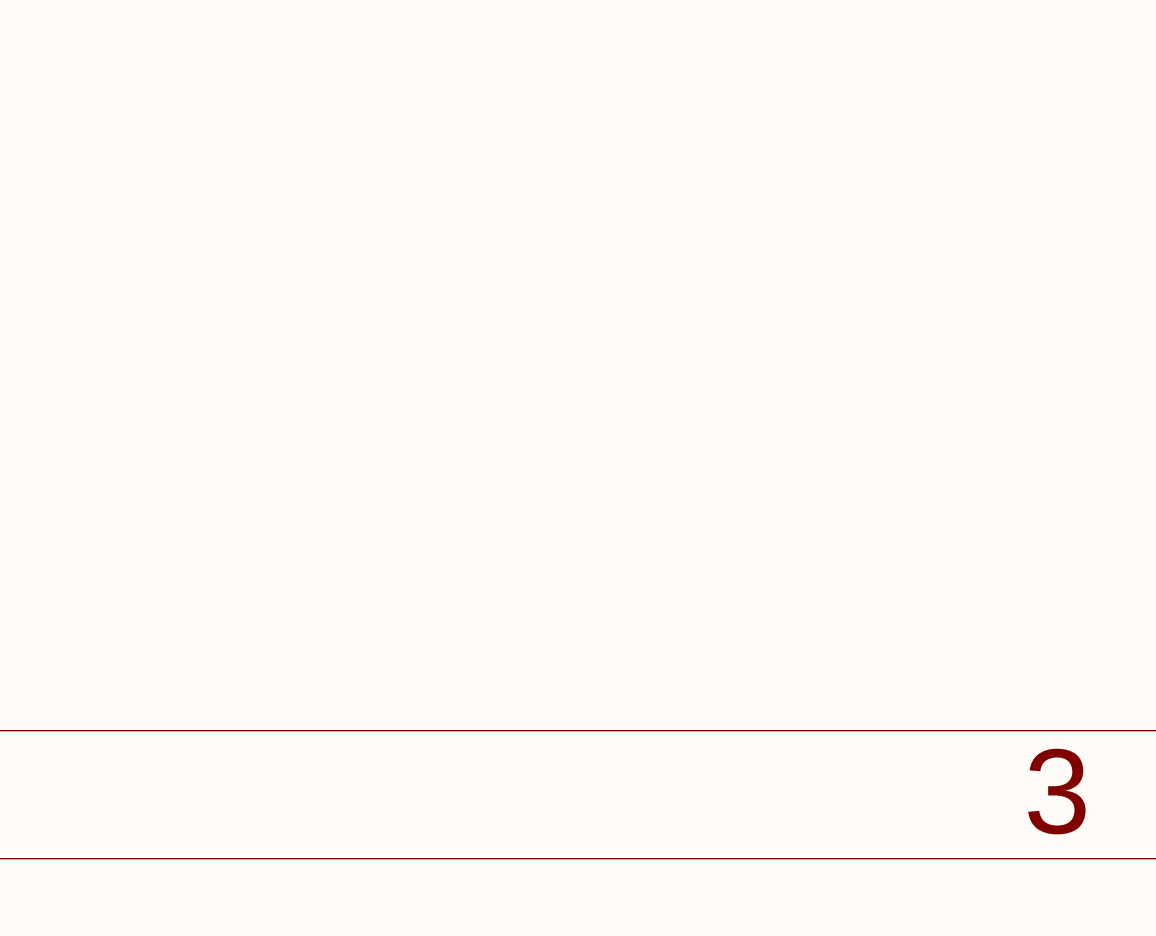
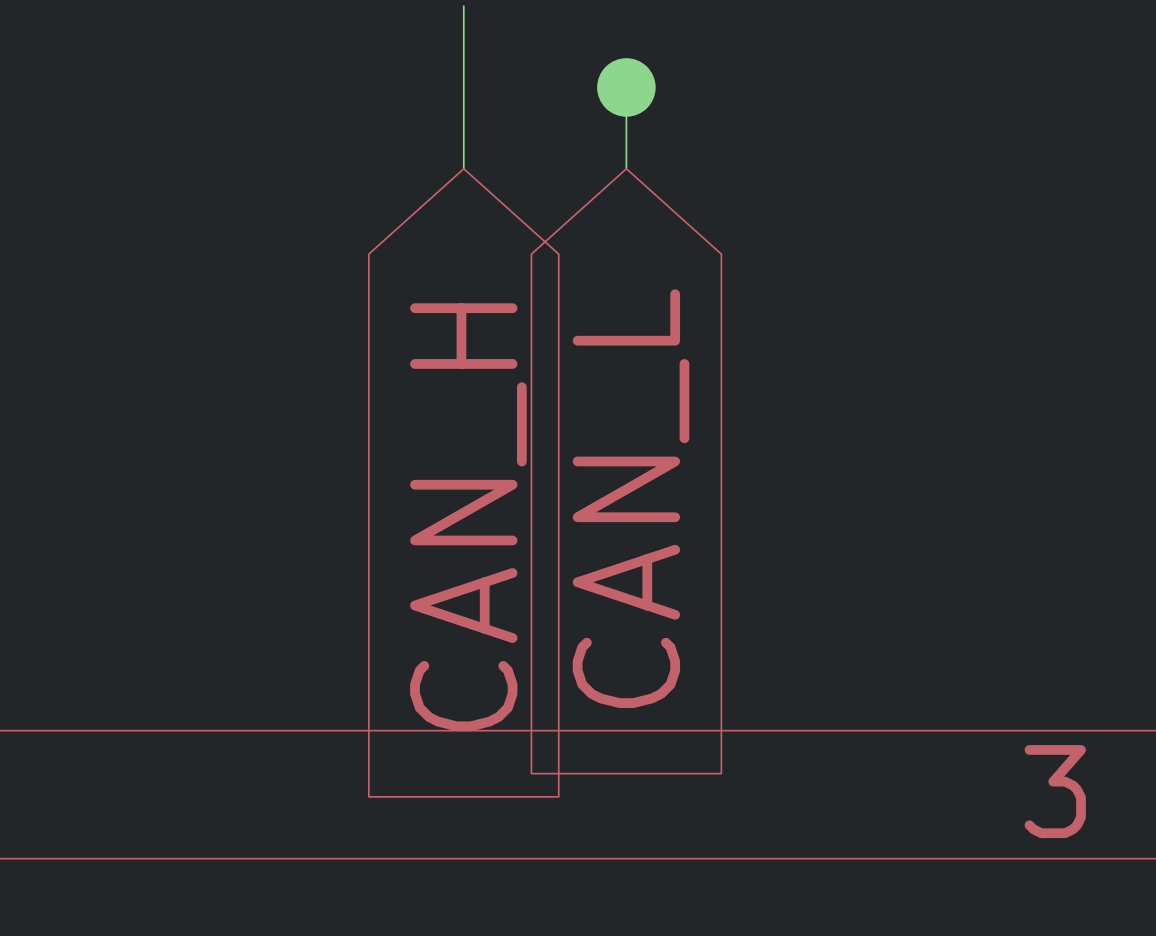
wire: none -> (463, 6) (463, 168)
wire: none -> (626, 87) (626, 168)
junction: none -> (626, 87)
global label: none -> CAN_L (631, 498)
global label: none -> CAN_H (468, 517)

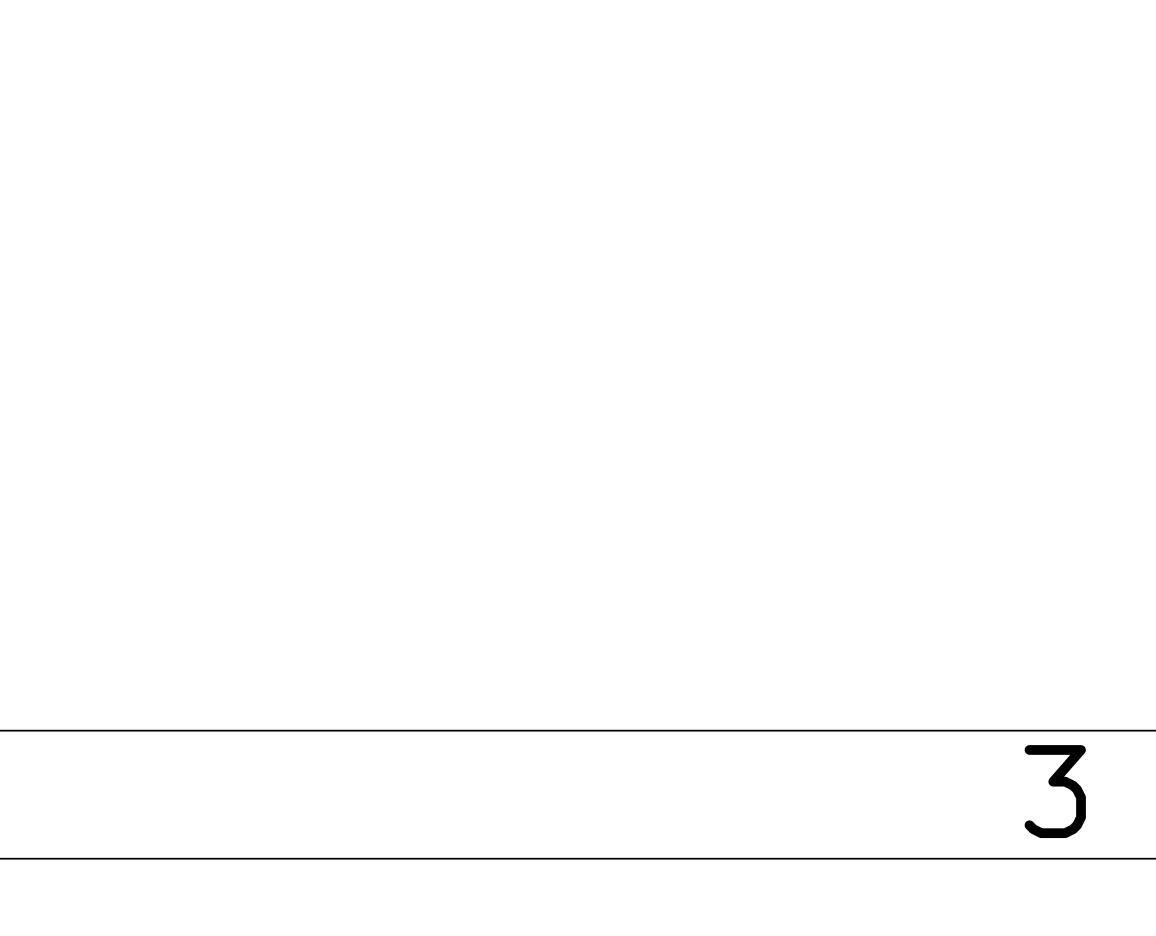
wire: (463, 6) (463, 168) -> none
wire: (626, 87) (626, 168) -> none
junction: (626, 87) -> none
global label: CAN_L (631, 498) -> none
global label: CAN_H (468, 517) -> none

